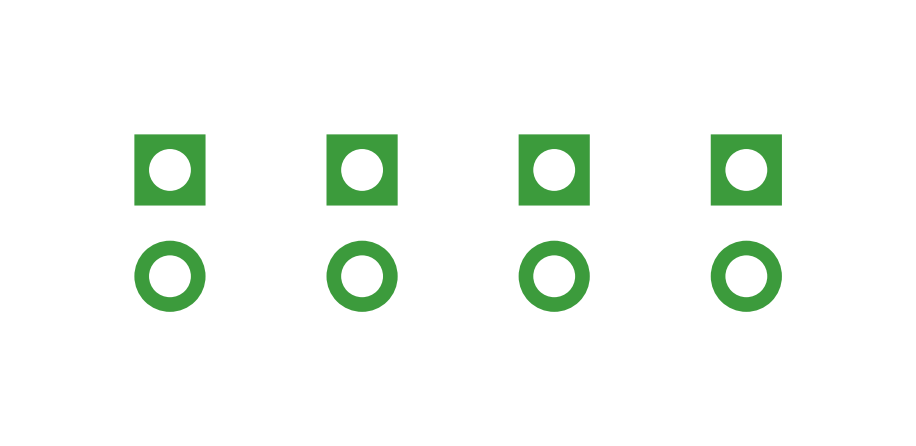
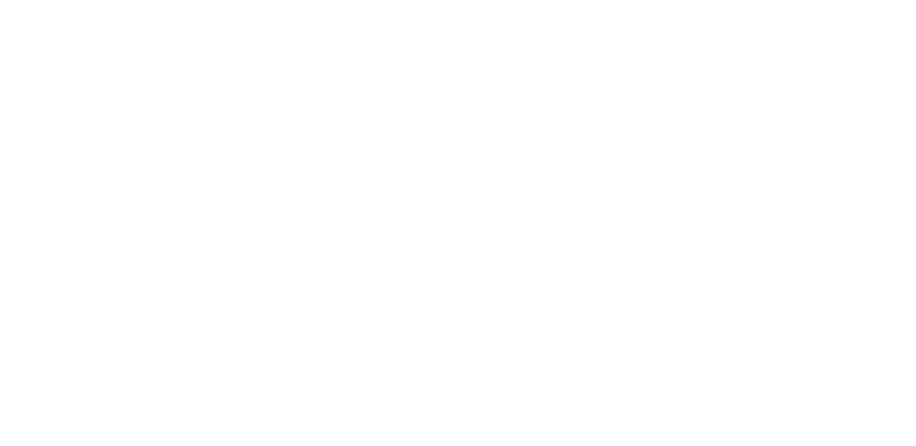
part: (169, 223) -> none
part: (362, 223) -> none
part: (554, 223) -> none
part: (746, 223) -> none

